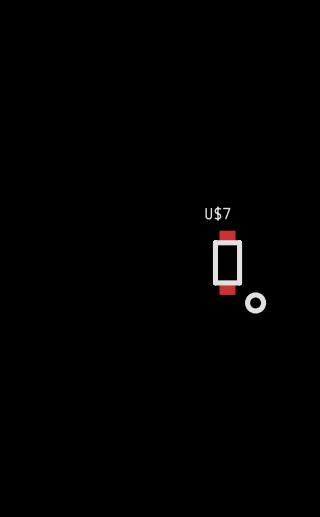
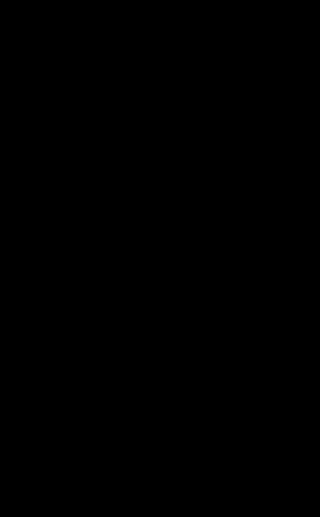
U$7: (239, 272) -> none

